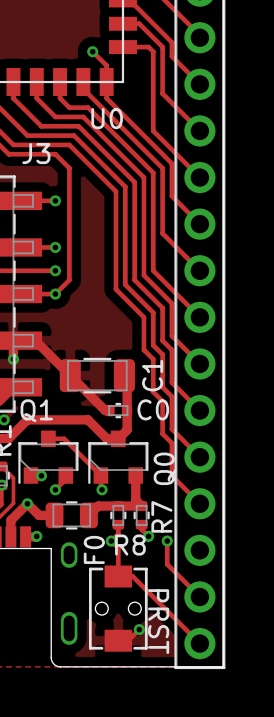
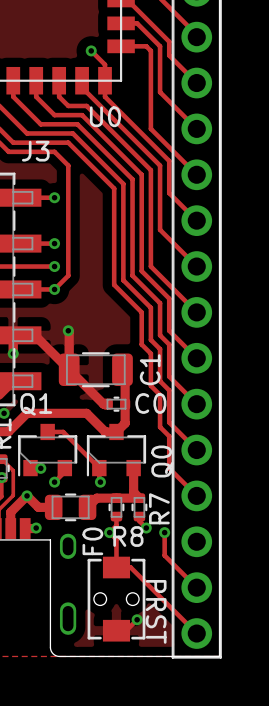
track: none -> (68, 330) (69, 369)
via: none -> (68, 330)

